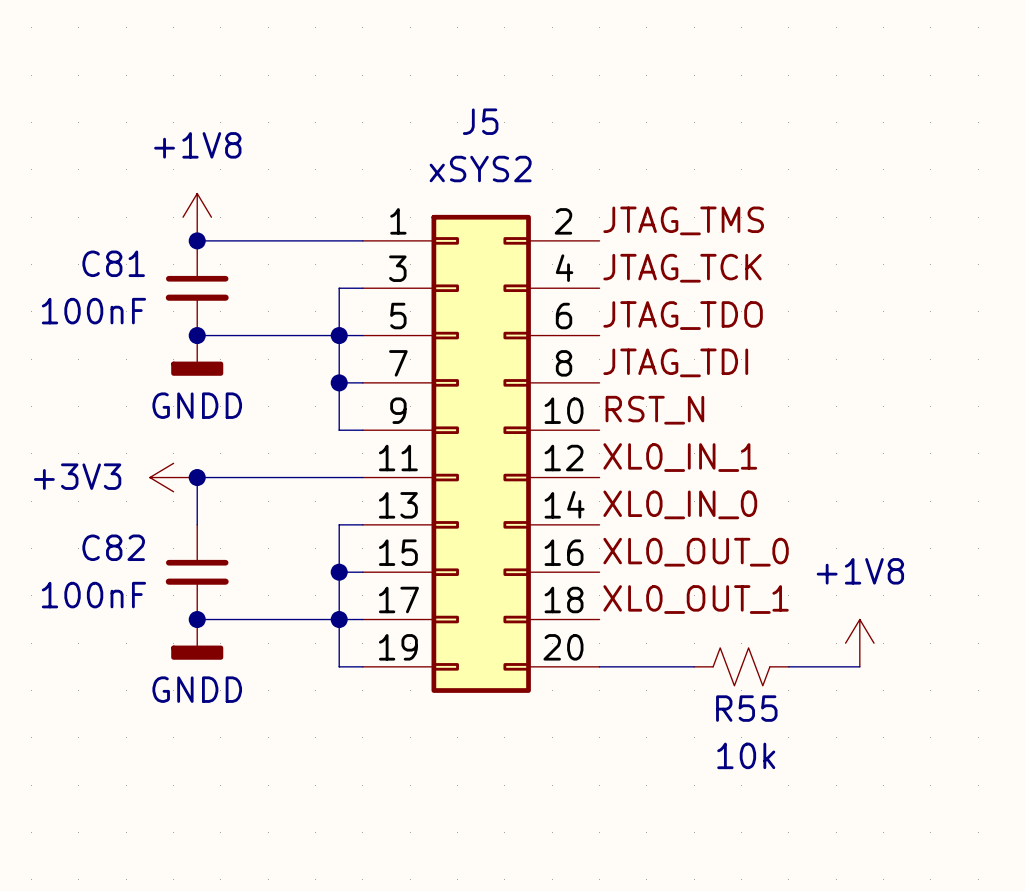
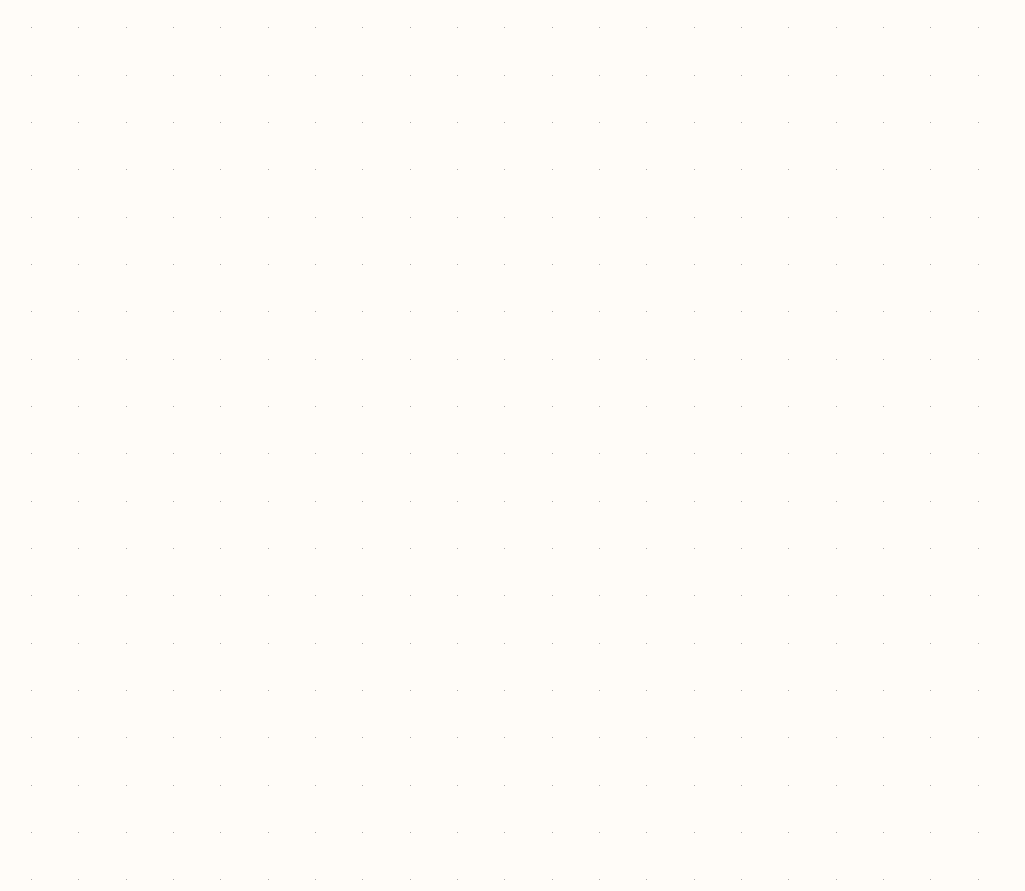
power symbol: +1V8 (197, 217) -> none
label: JTAG_TMS (683, 220) -> none
wire: (197, 240) (362, 240) -> none
junction: (197, 240) -> none
label: JTAG_TCK (682, 268) -> none
C81: 100nF (197, 288) -> none
wire: (362, 288) (339, 288) (339, 430) (362, 430) -> none
label: JTAG_TDO (683, 315) -> none
wire: (197, 335) (362, 335) -> none
junction: (197, 335) -> none
junction: (339, 335) -> none
power symbol: GNDD (197, 355) -> none
label: JTAG_TDI (675, 362) -> none
wire: (339, 382) (362, 382) -> none
junction: (339, 382) -> none
label: RST_N (654, 410) -> none
J5: xSYS2 (481, 453) -> none
label: XL0_IN_1 (680, 457) -> none
power symbol: +3V3 (173, 477) -> none
junction: (197, 477) -> none
wire: (362, 477) (197, 477) (197, 524) -> none
label: XL0_IN_0 (680, 504) -> none
wire: (362, 524) (339, 524) (339, 666) (362, 666) -> none
label: XL0_OUT_0 (696, 552) -> none
C82: 100nF (197, 572) -> none
wire: (339, 572) (362, 572) -> none
junction: (339, 572) -> none
label: XL0_OUT_1 (696, 599) -> none
wire: (197, 619) (362, 619) -> none
junction: (197, 619) -> none
junction: (339, 619) -> none
power symbol: GNDD (197, 639) -> none
power symbol: +1V8 (859, 643) -> none
wire: (599, 666) (694, 666) -> none
R55: 10k (741, 666) -> none
wire: (788, 666) (859, 666) -> none

